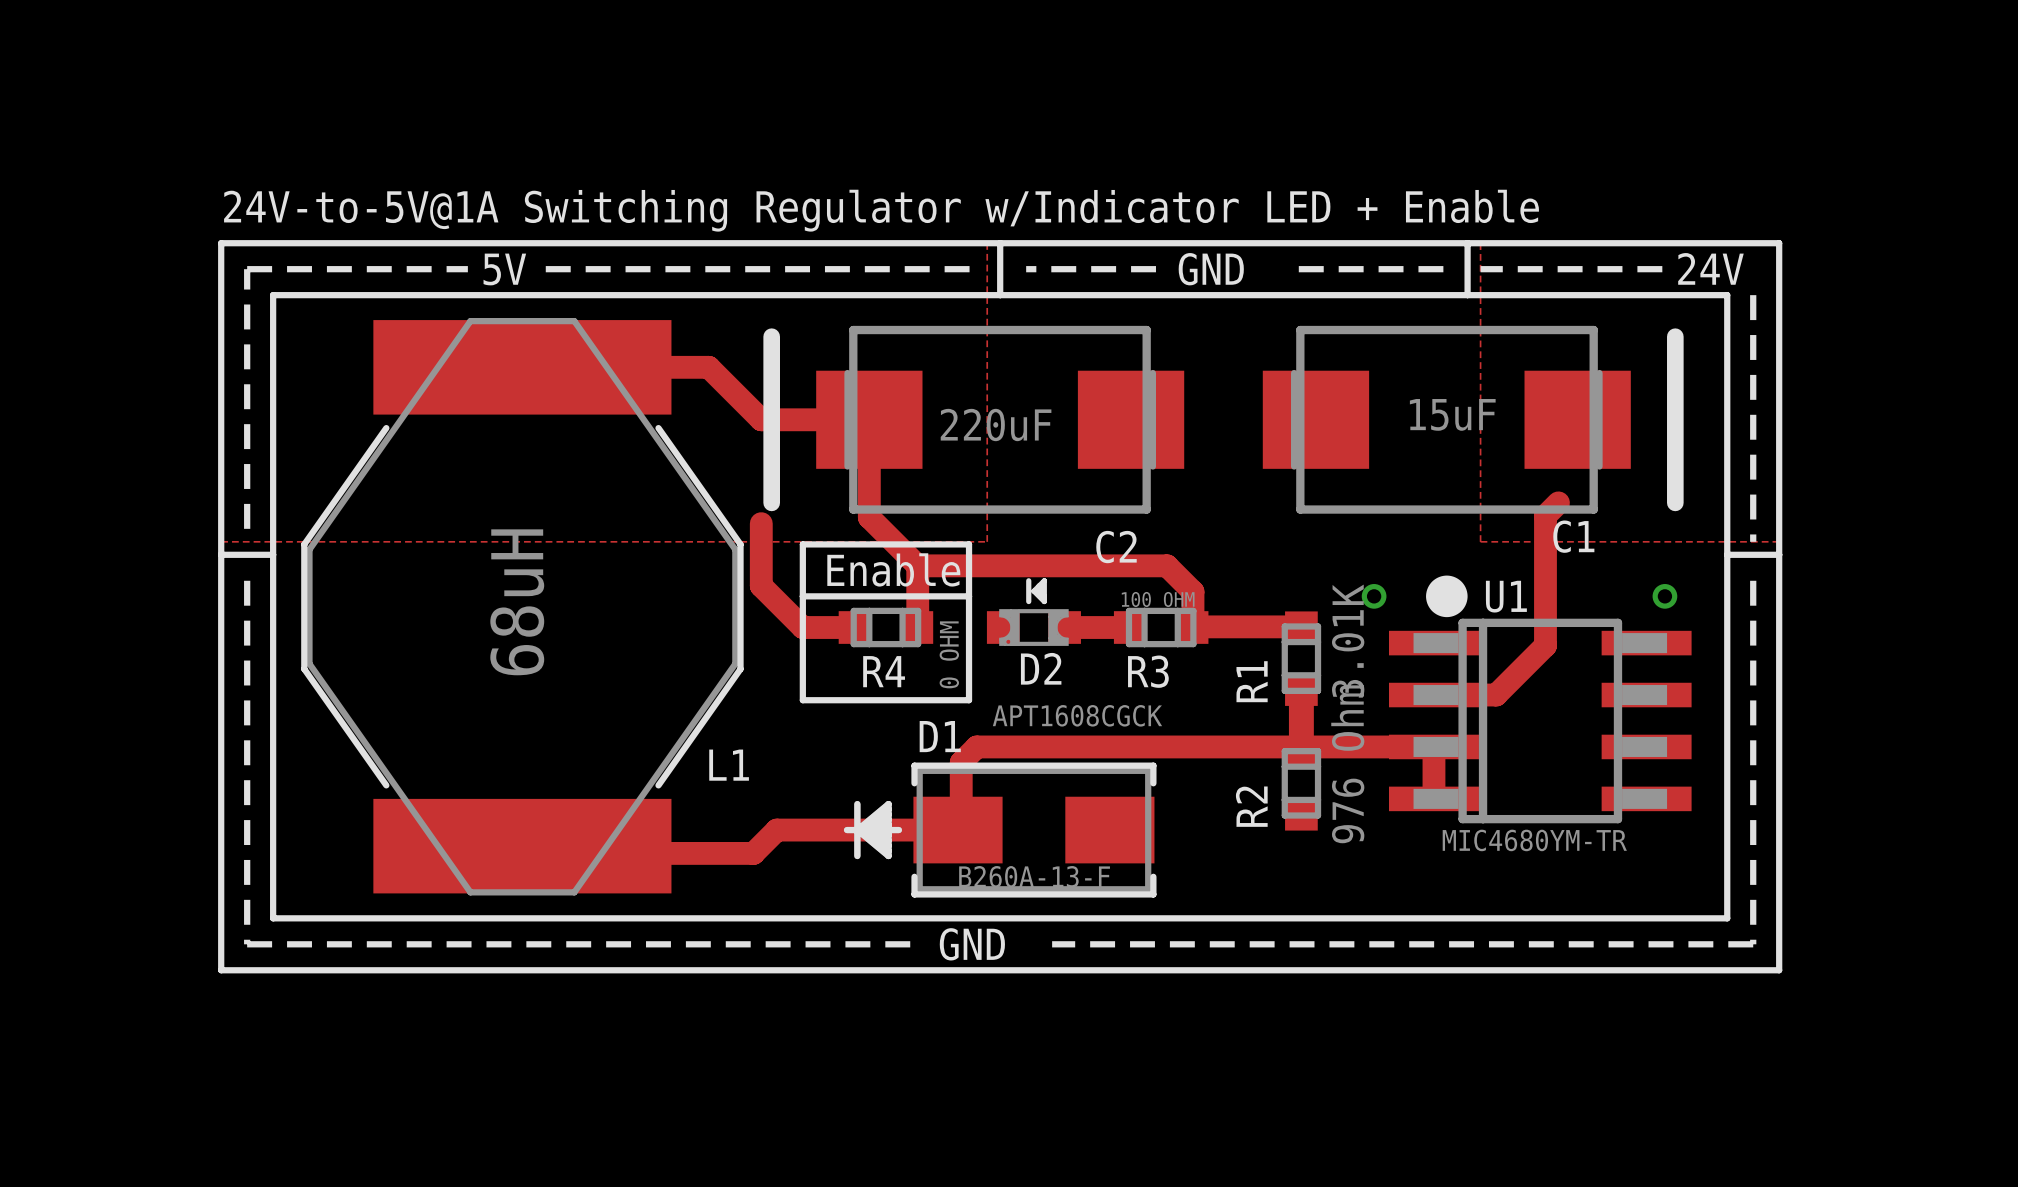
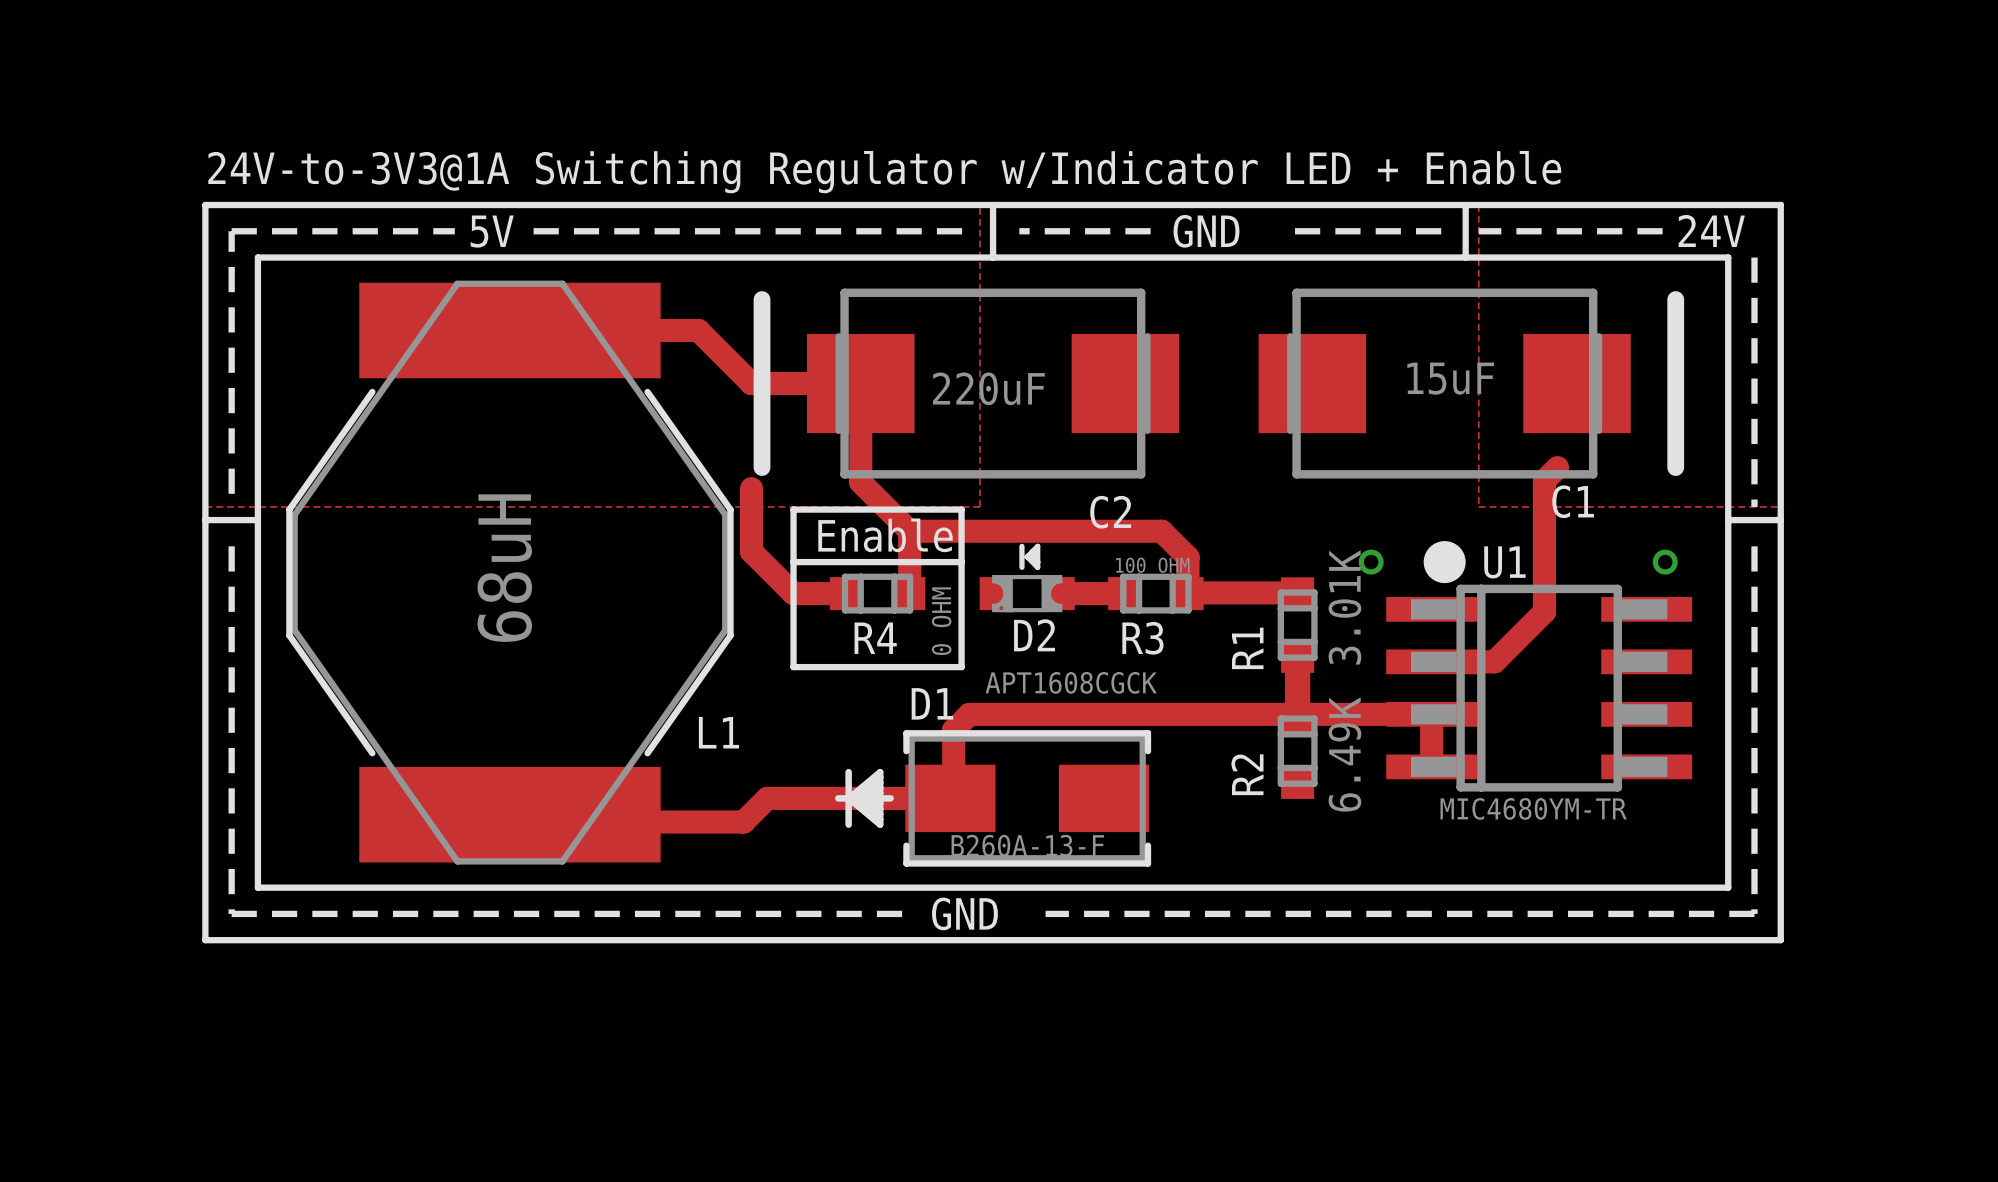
text: 24V-to-5V@1A Switching Regulator w/Indicator LED + Enable (881, 210) -> 24V-to-3V3@1A Switching Regulator w/Indicator LED + Enable (884, 172)
R2 value: 976 Ohm (1347, 764) -> 6.49K (1344, 754)

